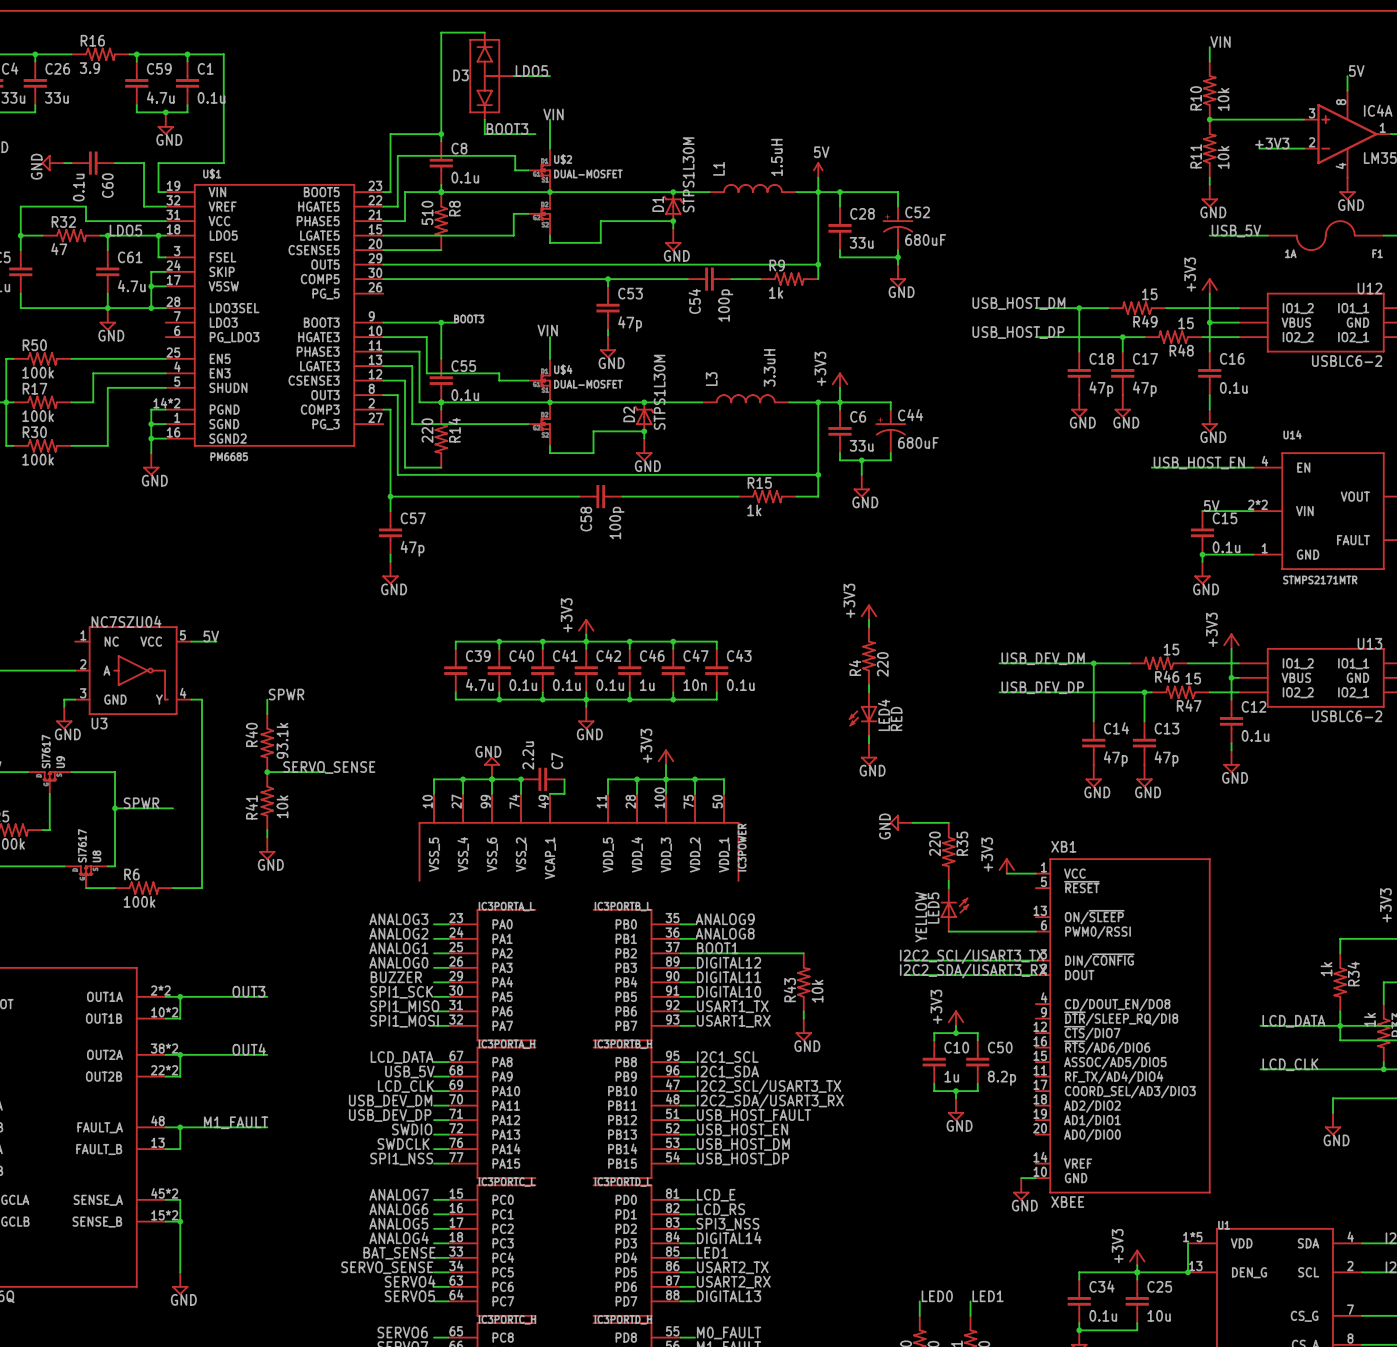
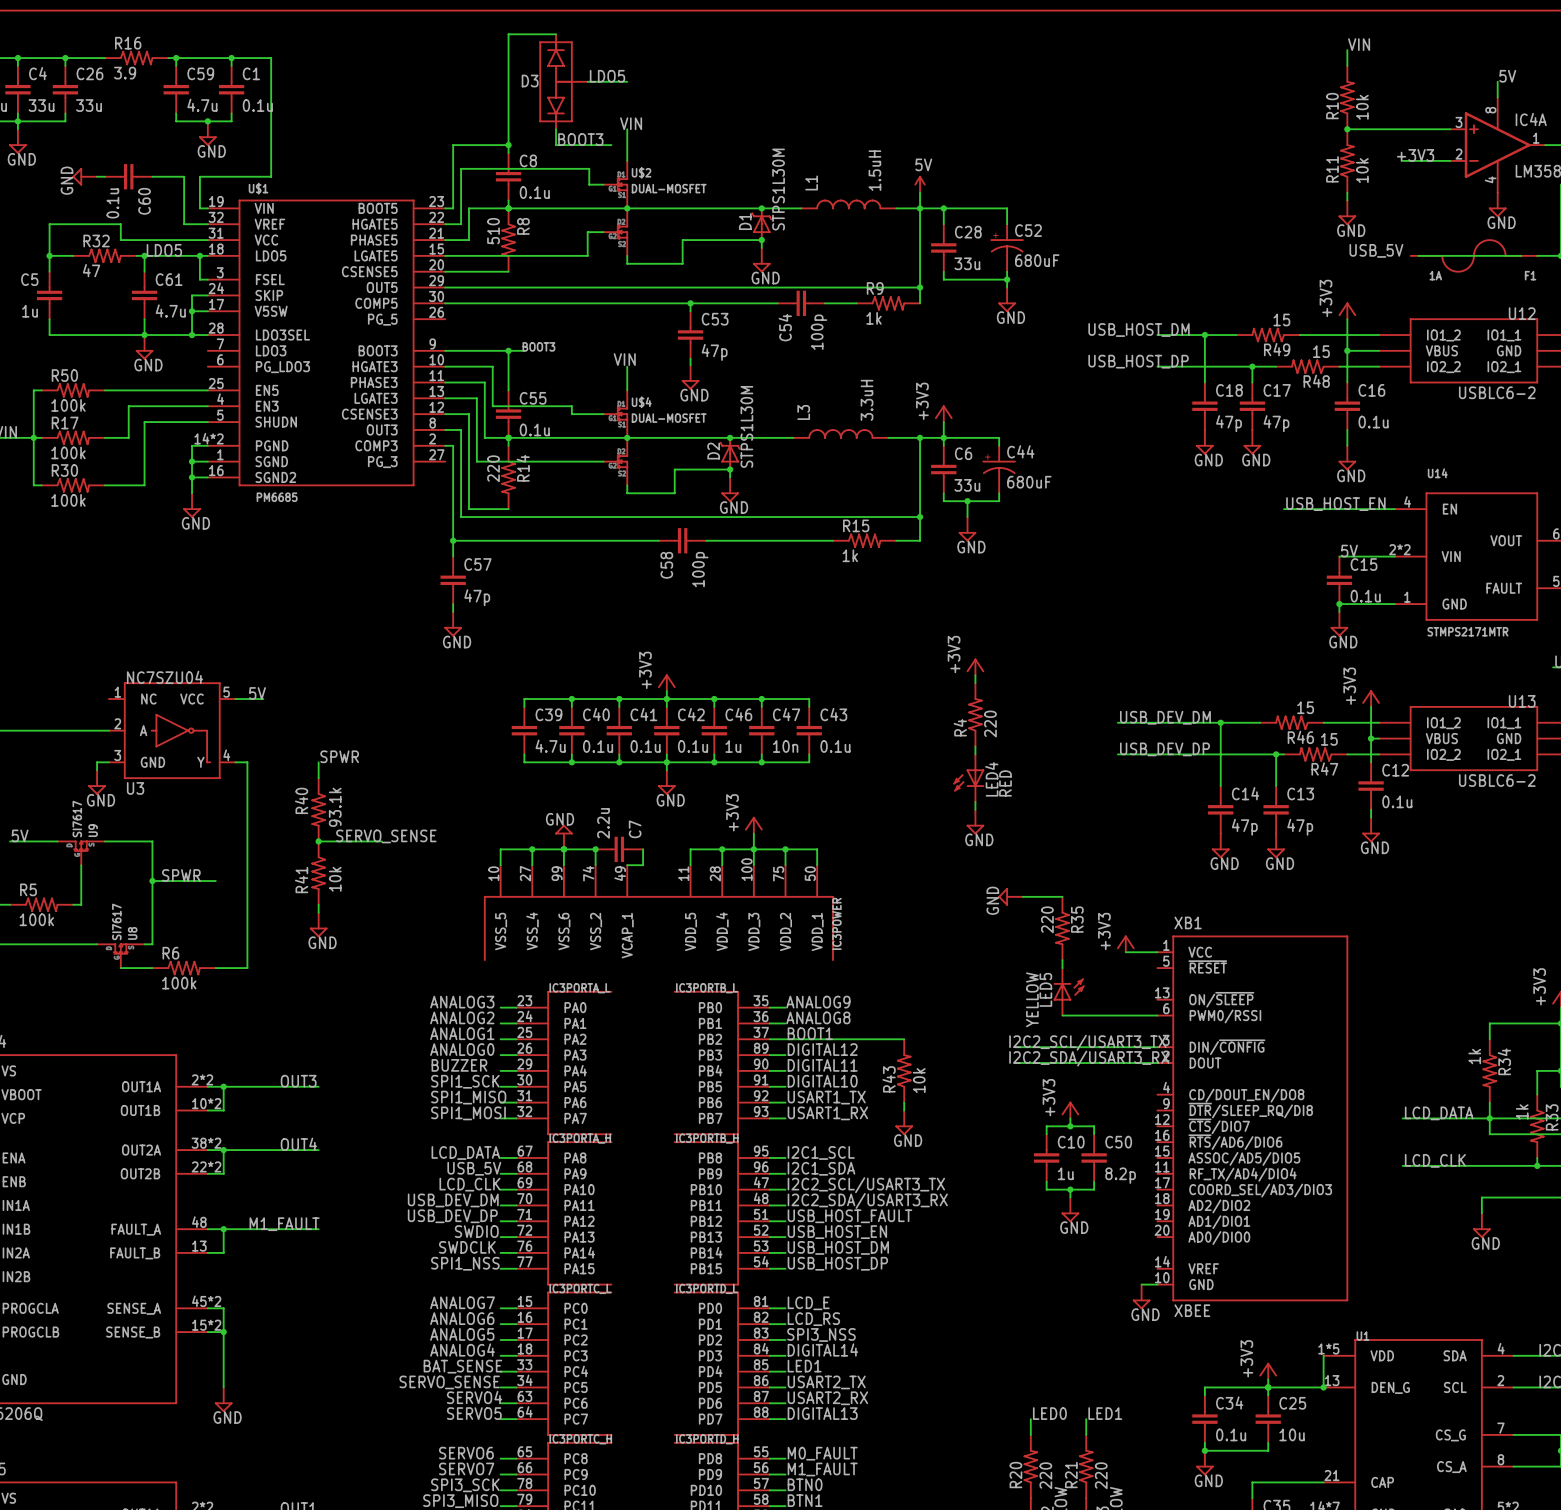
wire: (1209, 235) (1267, 235) -> none
wire: none -> (1418, 255) (1521, 255)

